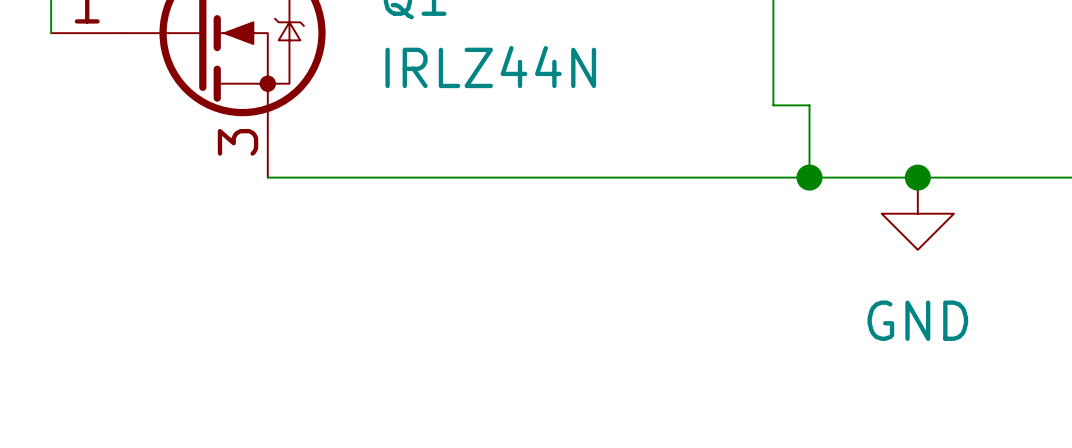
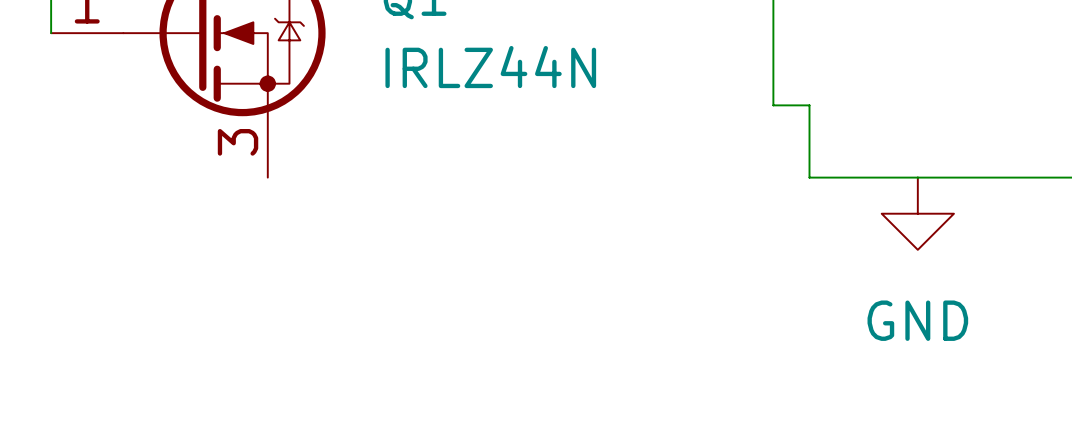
wire: (267, 177) (809, 177) -> none
junction: (809, 177) -> none
junction: (917, 177) -> none

